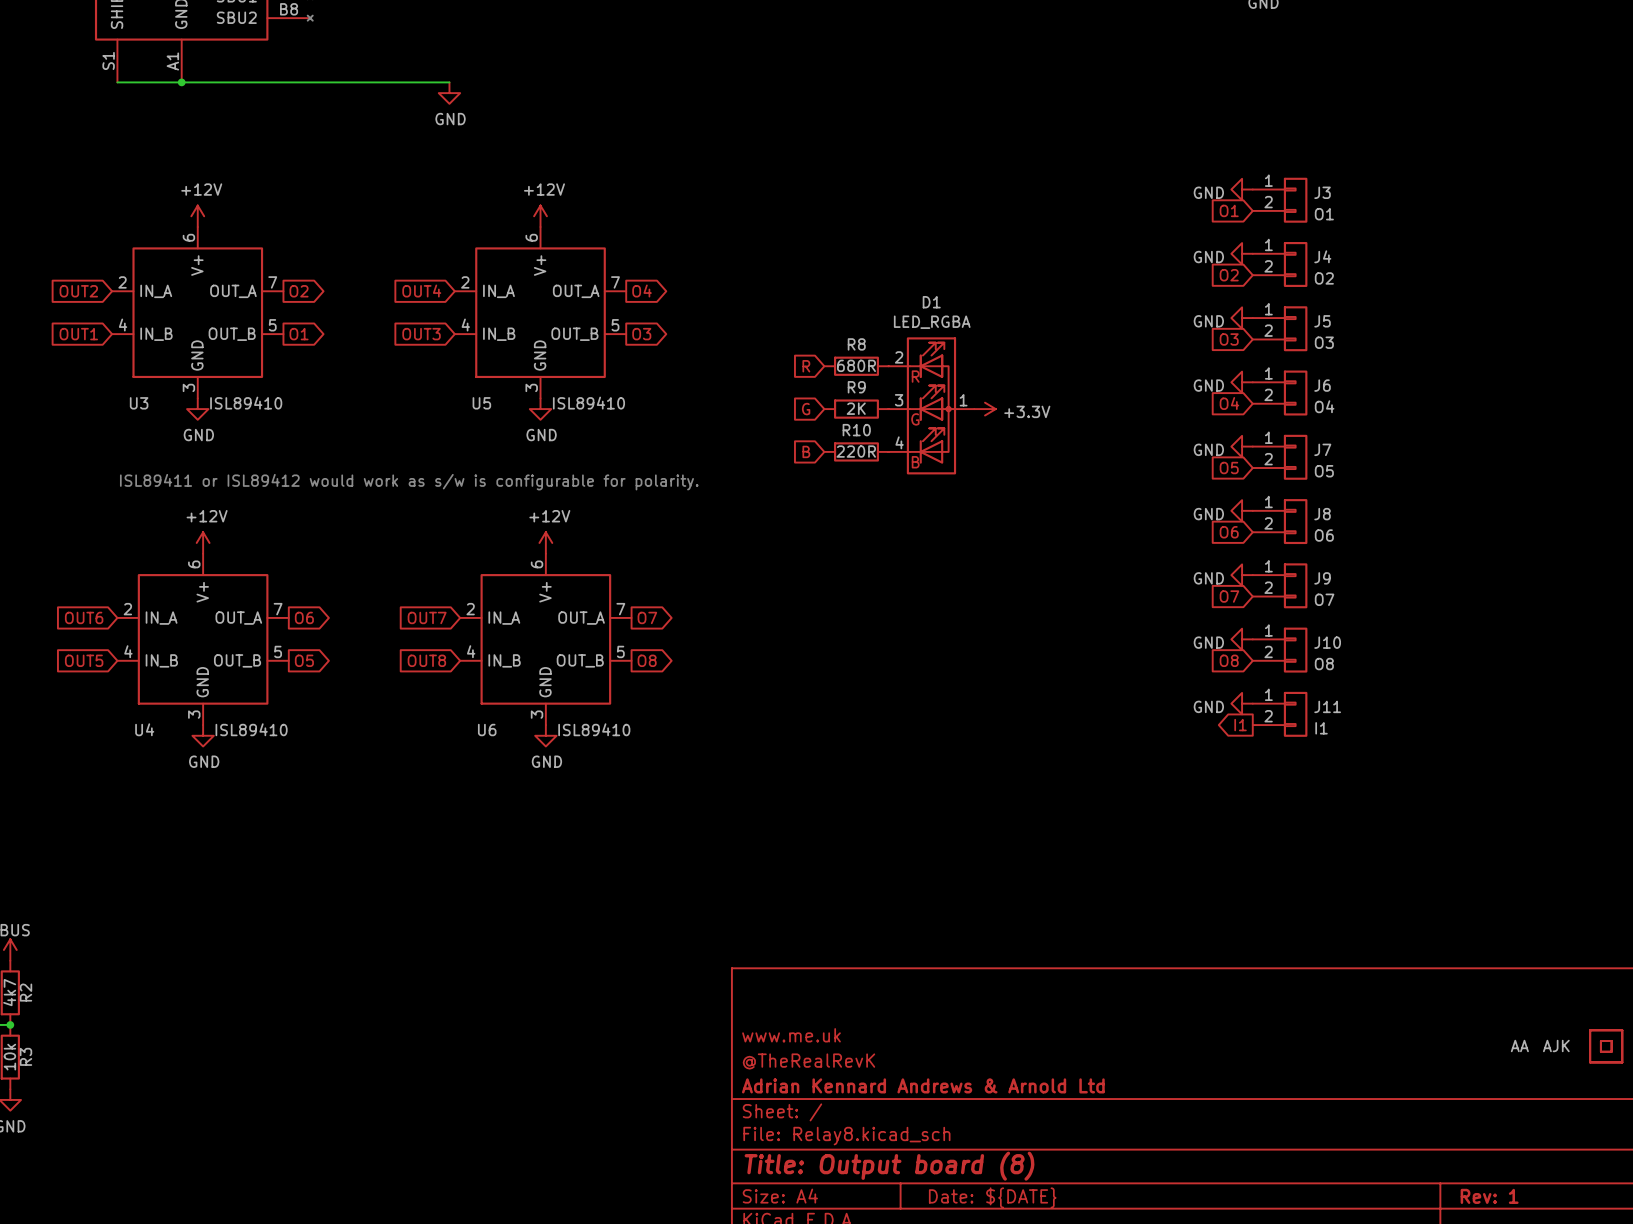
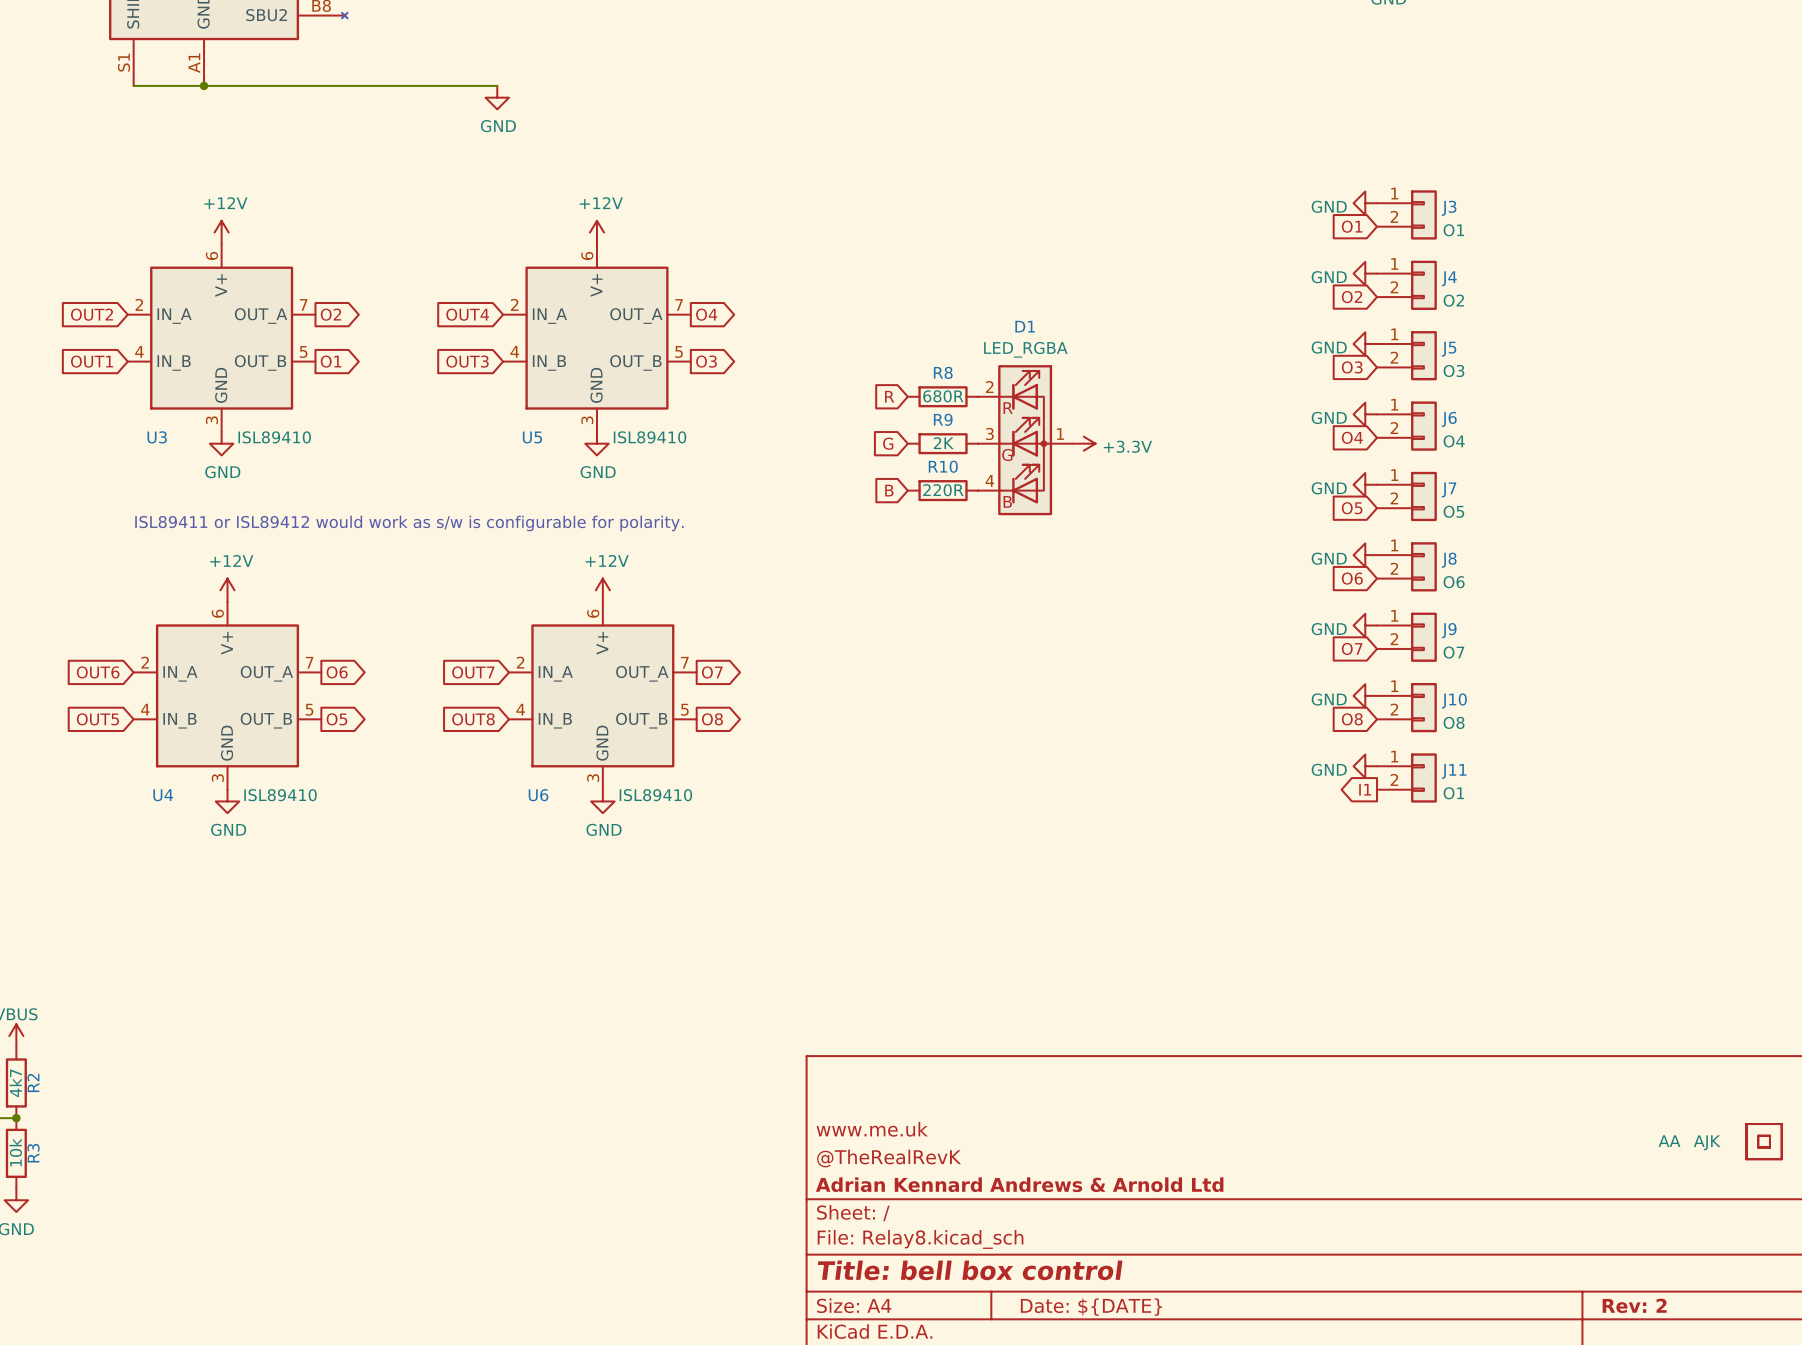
J11 value: I1 (1321, 728) -> O1 (1453, 793)
title block: Title: Output board (8) (889, 1166) -> Title: bell box control (970, 1270)
title block: Rev: 1 (1489, 1196) -> Rev: 2 (1634, 1305)

